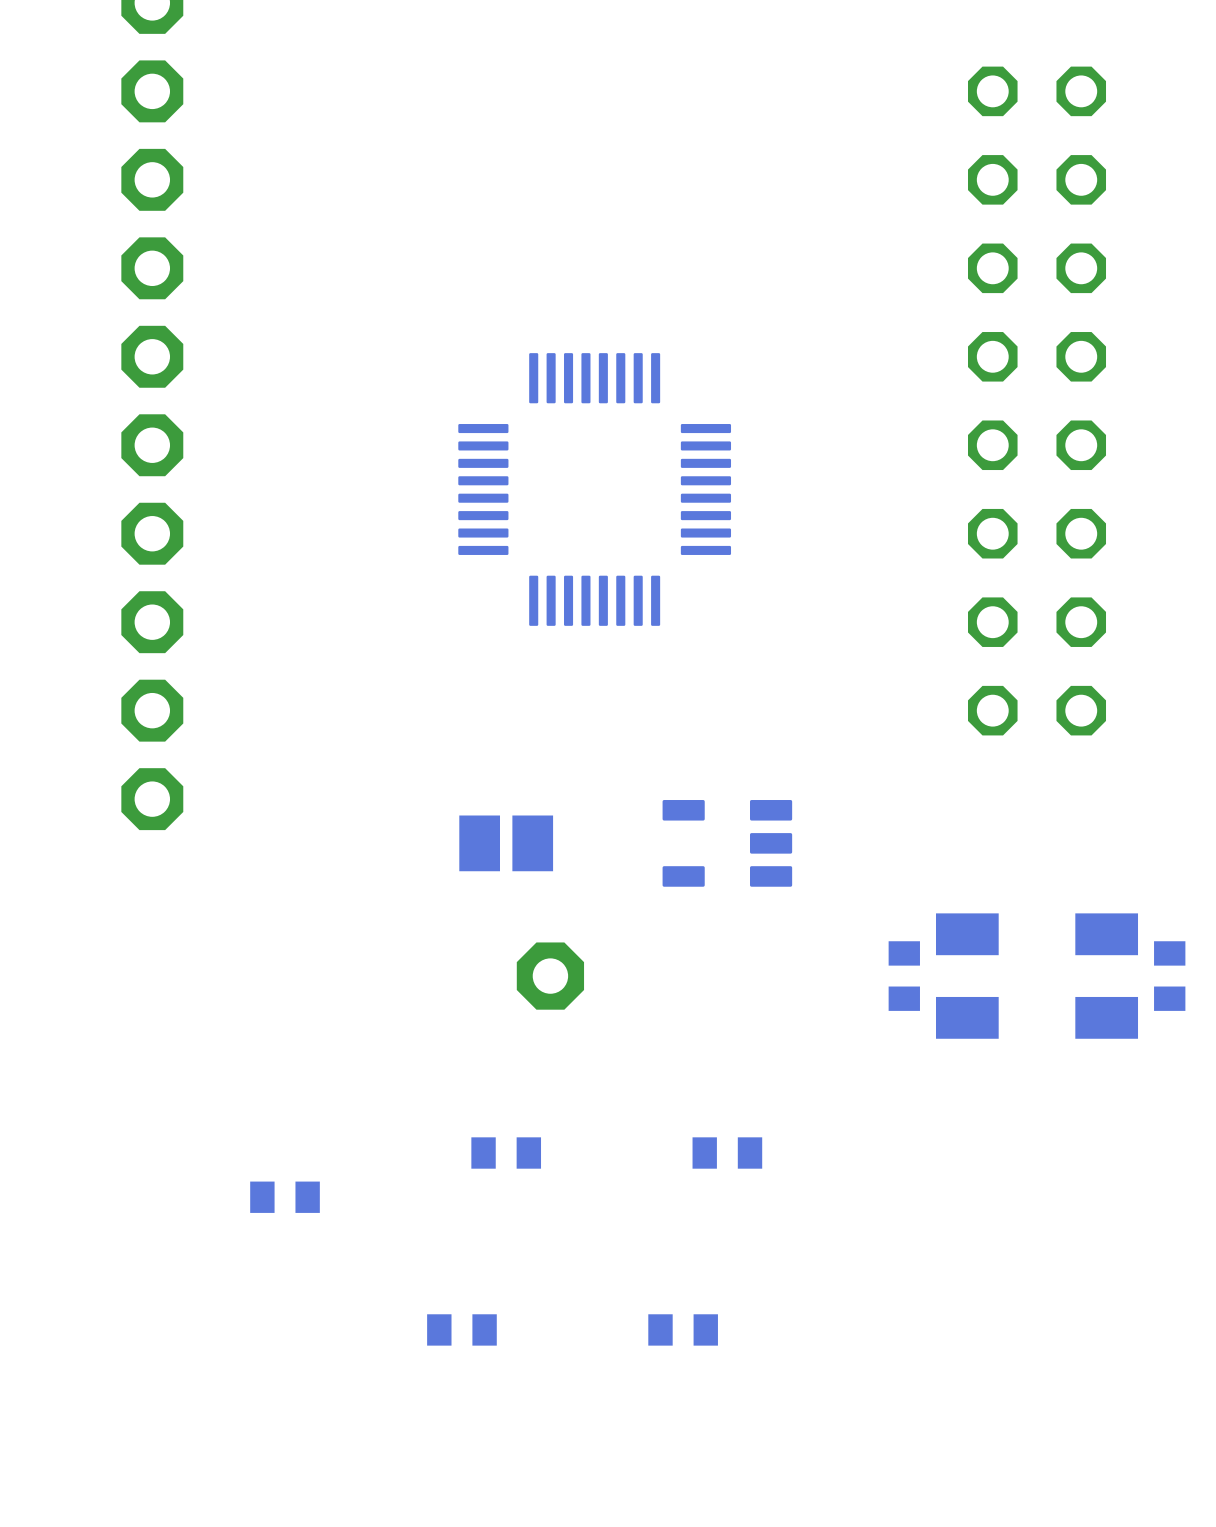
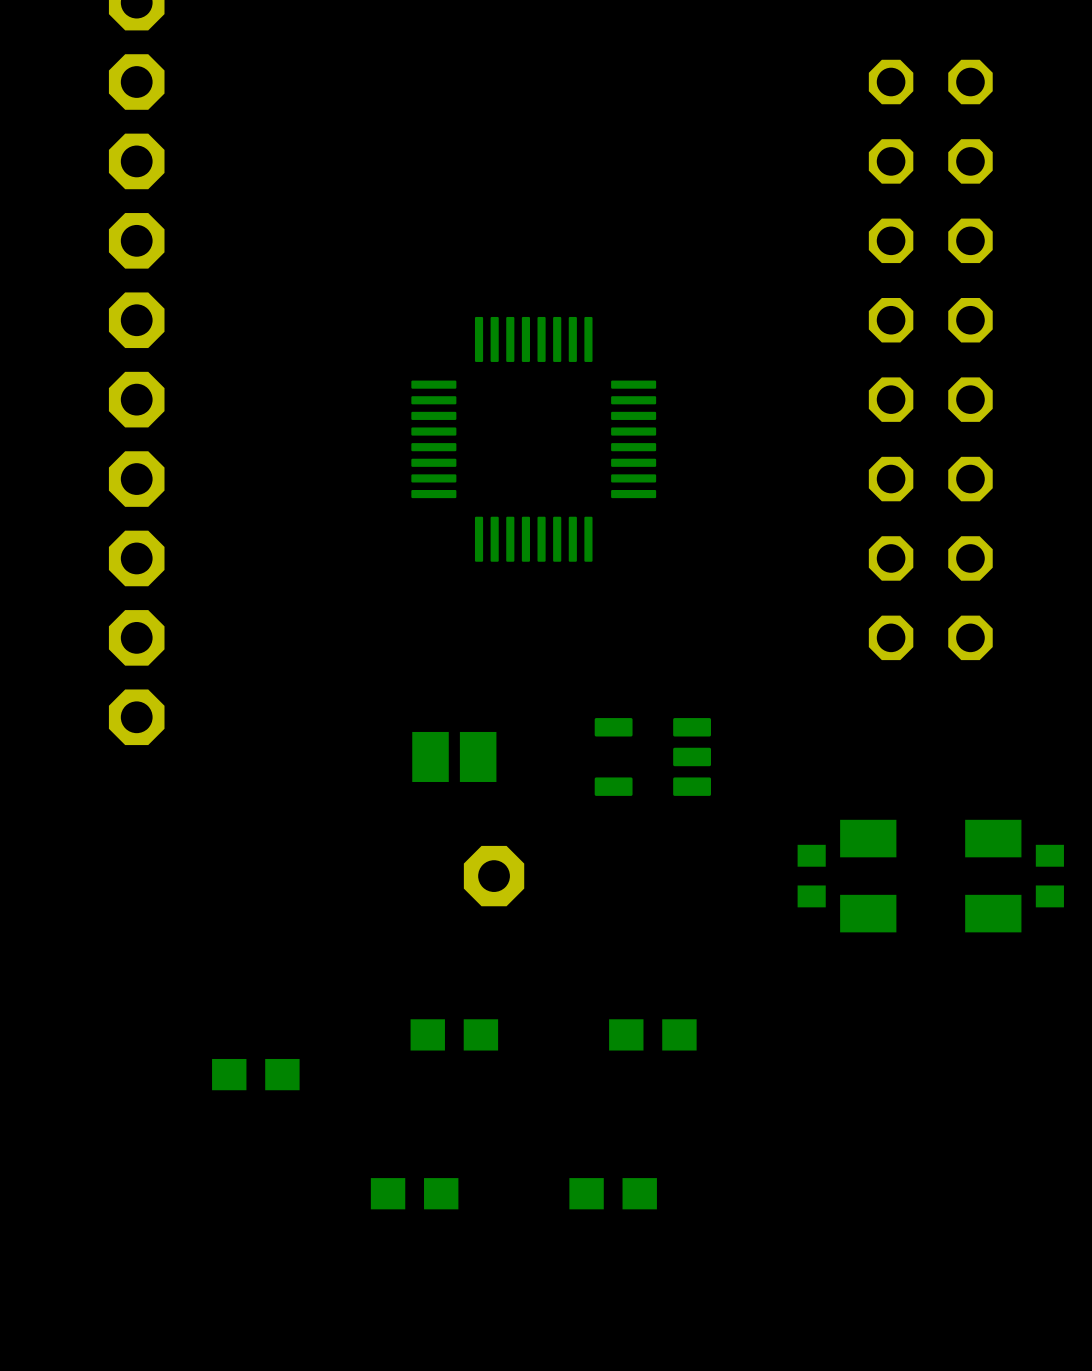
part footprint: [471, 1137, 542, 1169] -> [410, 1019, 499, 1051]
part footprint: [692, 1137, 763, 1169] -> [609, 1019, 697, 1051]
part footprint: [250, 1181, 320, 1213] -> [212, 1058, 300, 1091]
part footprint: [427, 1314, 497, 1346] -> [370, 1178, 459, 1210]
part footprint: [648, 1314, 718, 1346] -> [569, 1178, 657, 1210]

